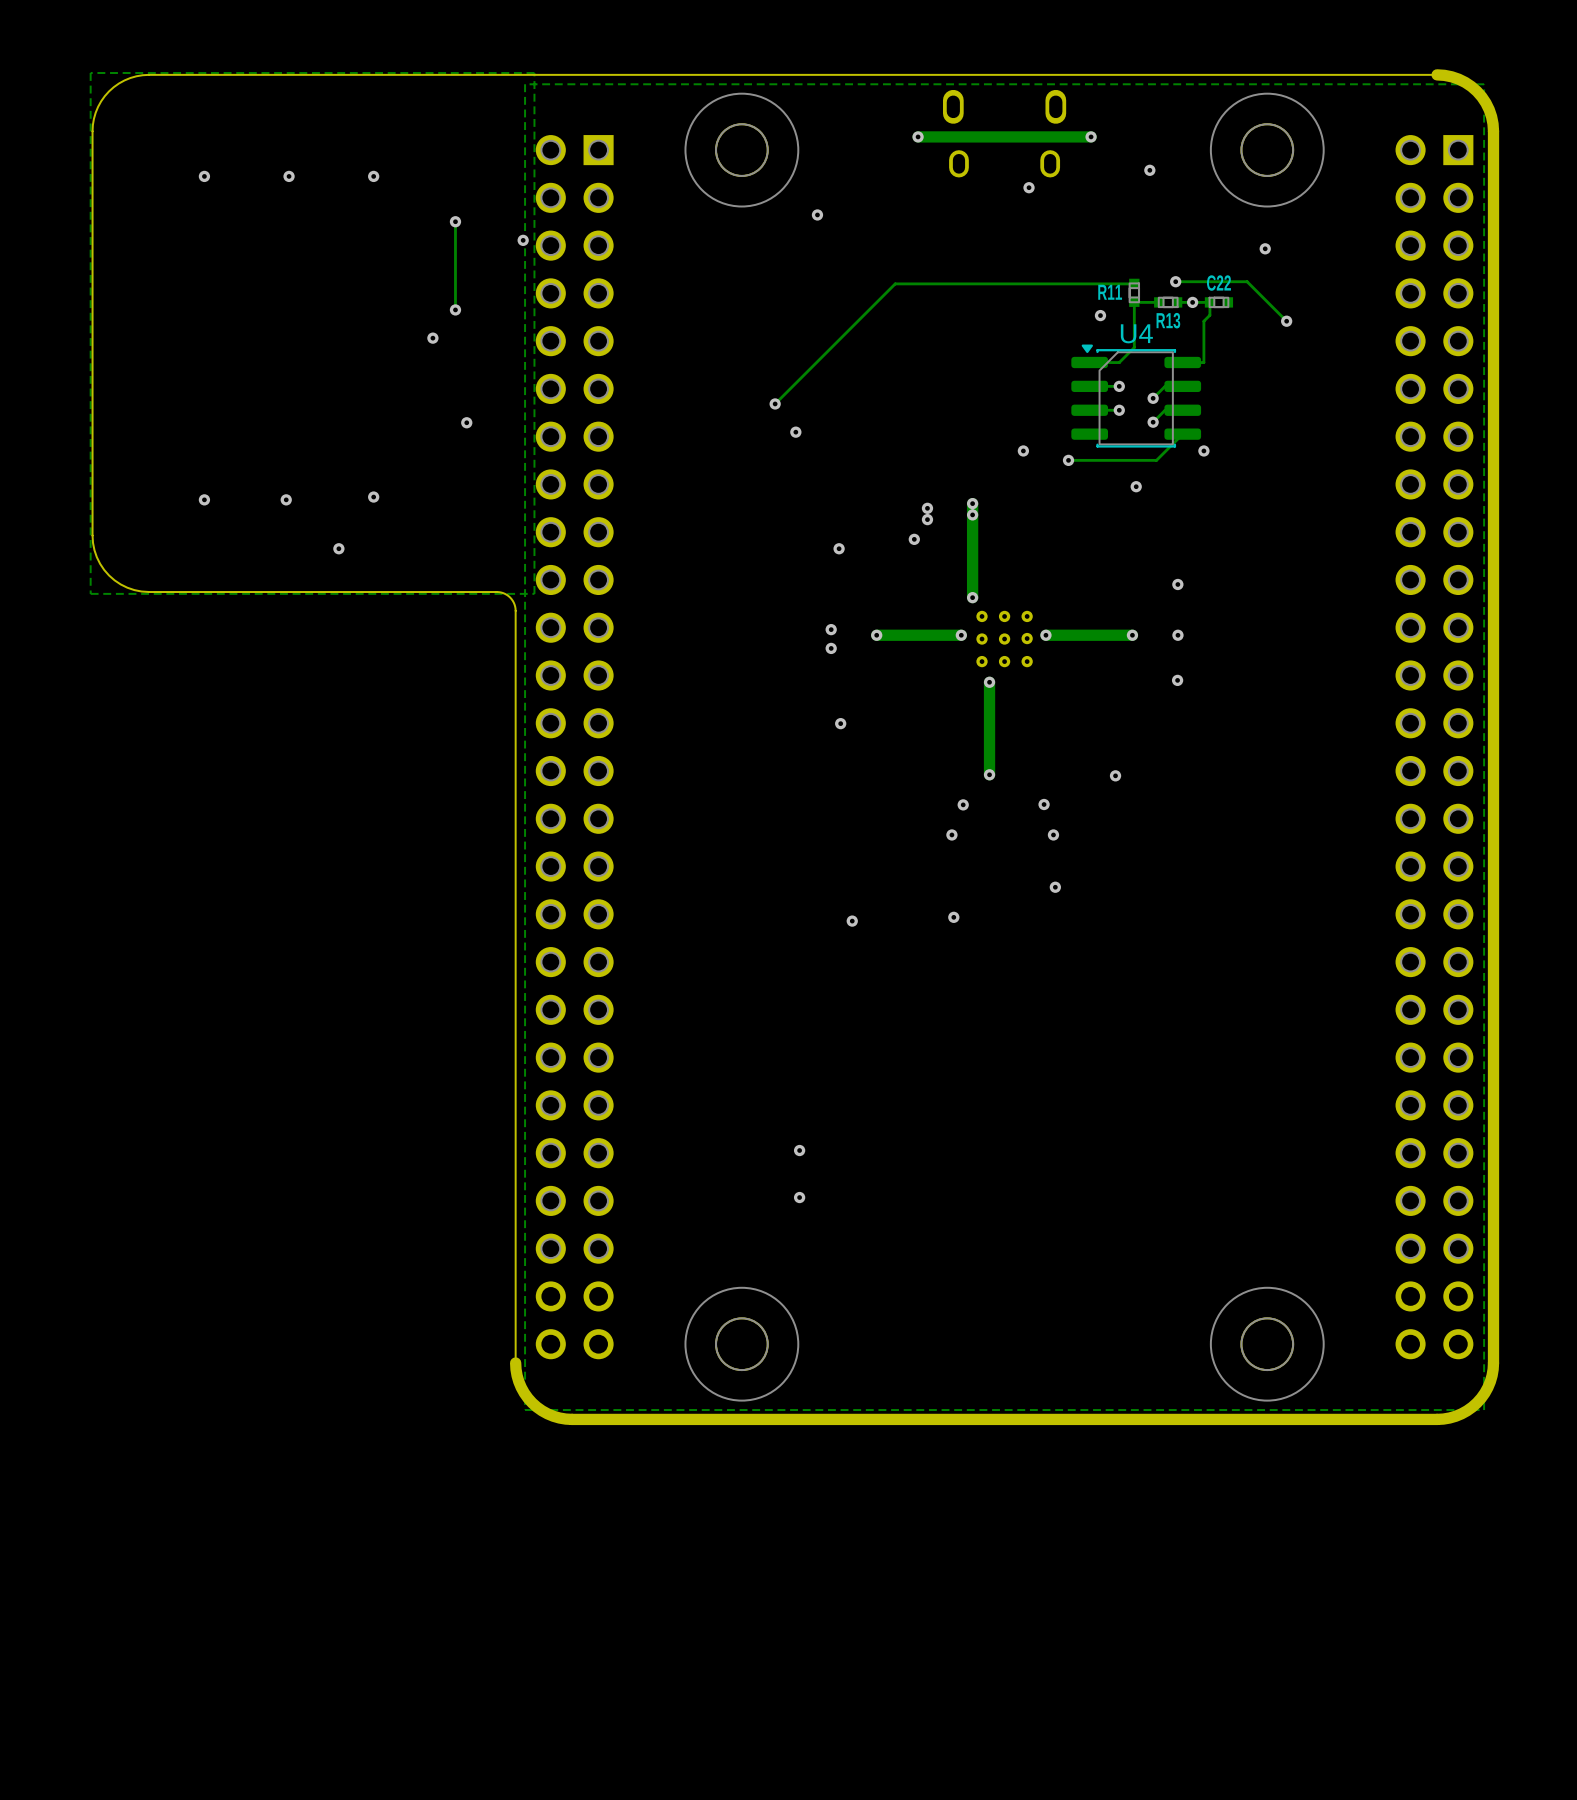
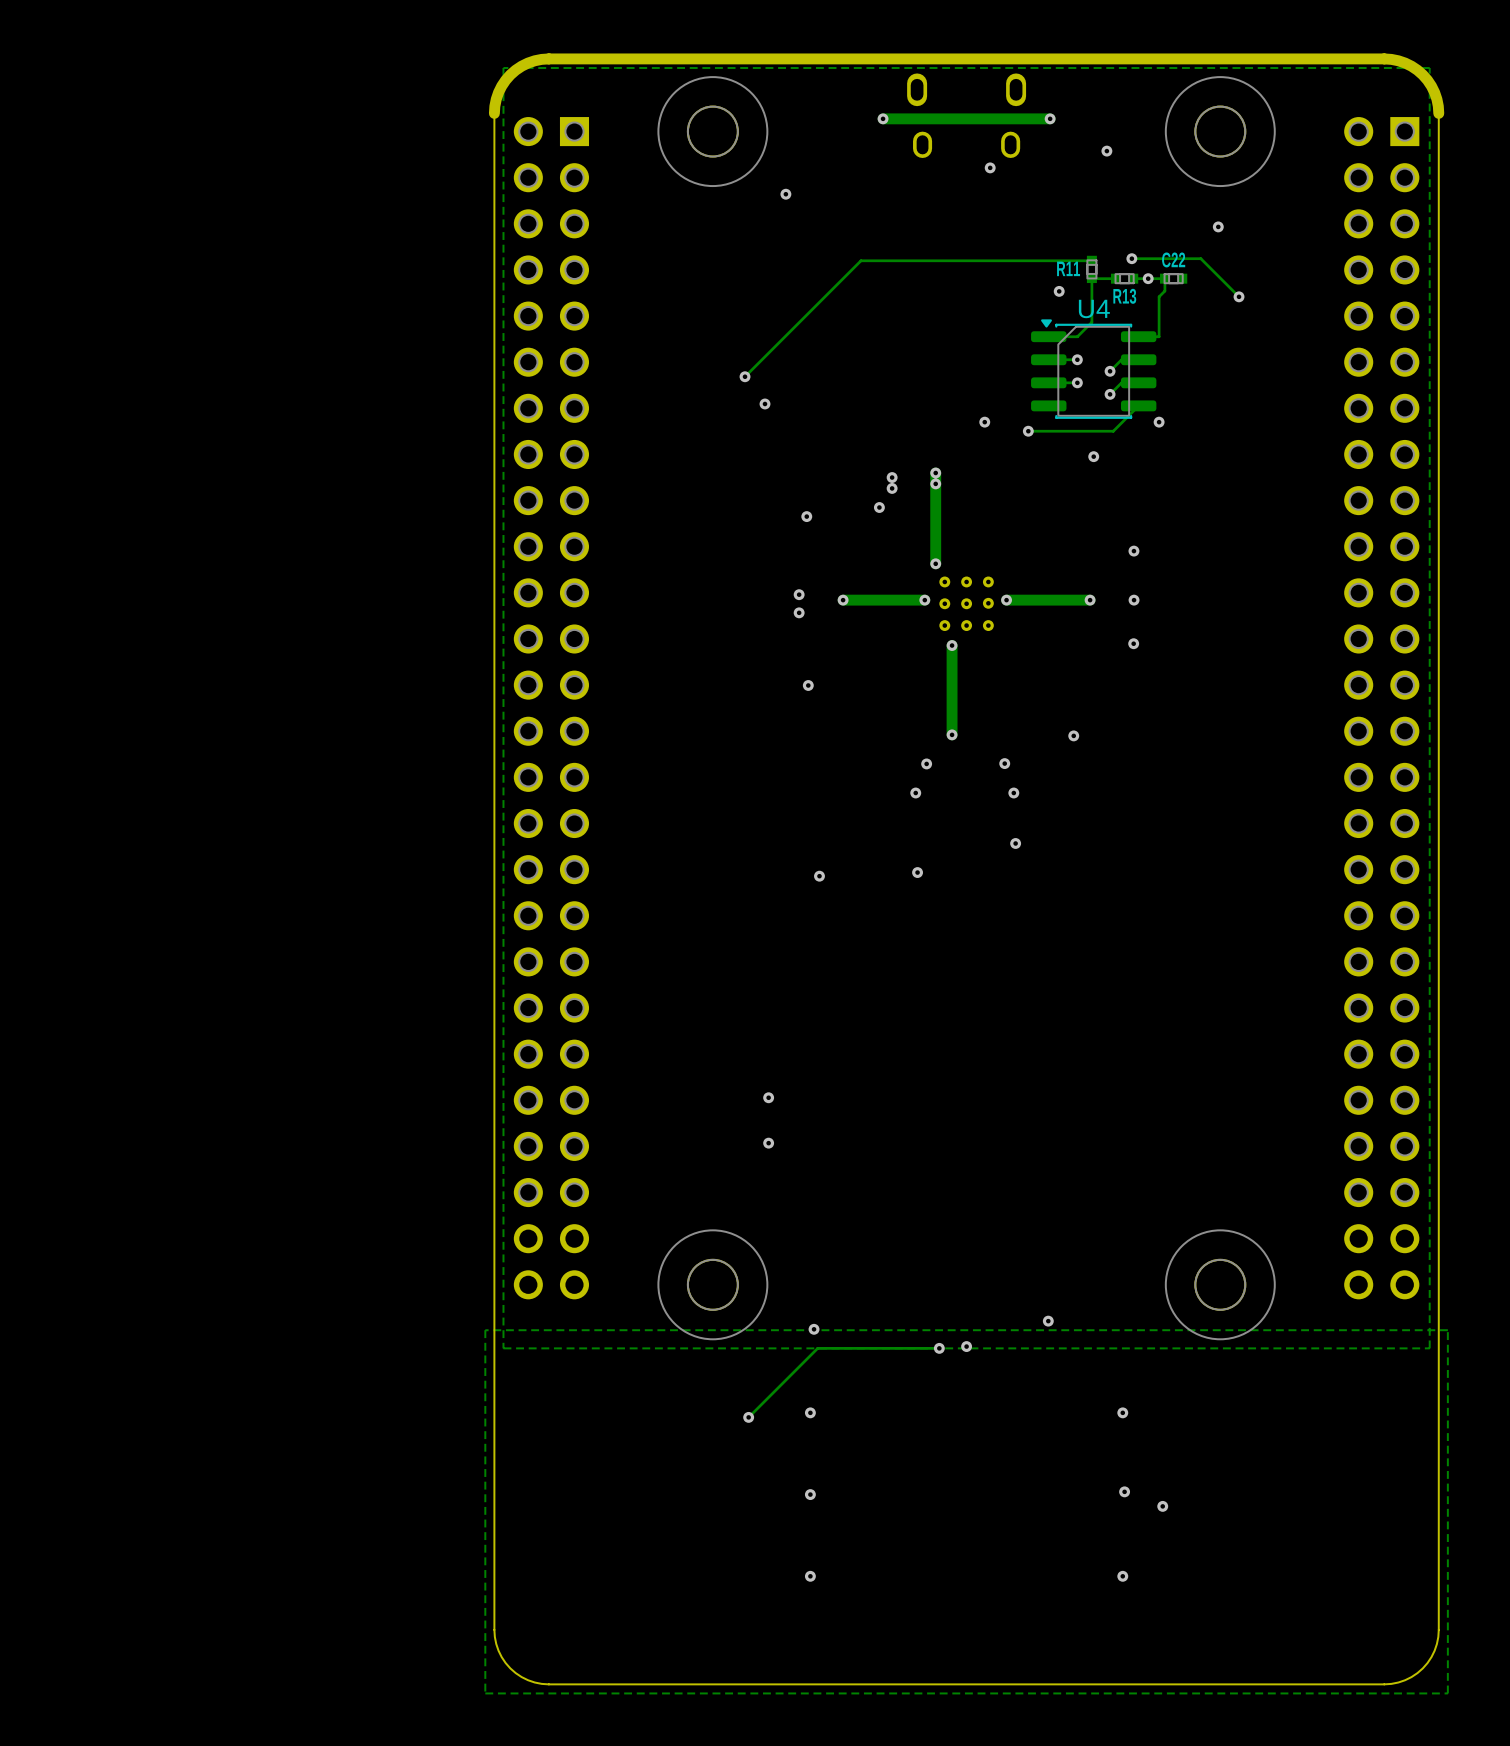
zone outline: (534, 72) (90, 72) (90, 593) (534, 593) (534, 72) -> none
board edge: (572, 74) (142, 75) (124, 80) (109, 91) (98, 106) (92, 124) (92, 535) (94, 550) (104, 569) (120, 584) (141, 591) (496, 592) (510, 597) (515, 610) -> (548, 58) (528, 63) (510, 74) (498, 92) (494, 106) (494, 576)
board edge width: thin (1437, 74) (572, 74) -> thick (1384, 58) (548, 58)
board edge width: thick (1493, 131) (1493, 1363) -> thin (1438, 113) (1438, 1302)
via: (204, 176) -> none
via: (289, 176) -> none
via: (373, 176) -> none
track: (455, 221) (455, 309) -> none
via: (455, 221) -> none
via: (523, 240) -> none
via: (455, 309) -> none
via: (432, 338) -> none
via: (466, 422) -> none
via: (373, 497) -> none
via: (204, 499) -> none
via: (286, 499) -> none
via: (338, 548) -> none
board edge: (1493, 1363) (1490, 1381) (1476, 1402) (1461, 1413) (1437, 1419) (565, 1419) (542, 1410) (527, 1398) (518, 1381) (515, 1363) -> (1438, 1302) (1438, 1636) (1431, 1657) (1417, 1673) (1405, 1680) (1384, 1684) (548, 1684) (528, 1680) (515, 1673) (505, 1663) (498, 1650) (494, 1636) (494, 1302)
via: none -> (1048, 1321)
via: none -> (814, 1329)
zone outline: none -> (1447, 1330) (485, 1330) (485, 1693) (1447, 1693) (1447, 1330)
via: none -> (966, 1346)
track: none -> (939, 1348) (817, 1348) (748, 1417)
via: none -> (939, 1348)
via: none -> (810, 1412)
via: none -> (1122, 1412)
via: none -> (748, 1417)
via: none -> (1124, 1491)
via: none -> (810, 1494)
via: none -> (1162, 1506)
via: none -> (810, 1576)
via: none -> (1122, 1576)

